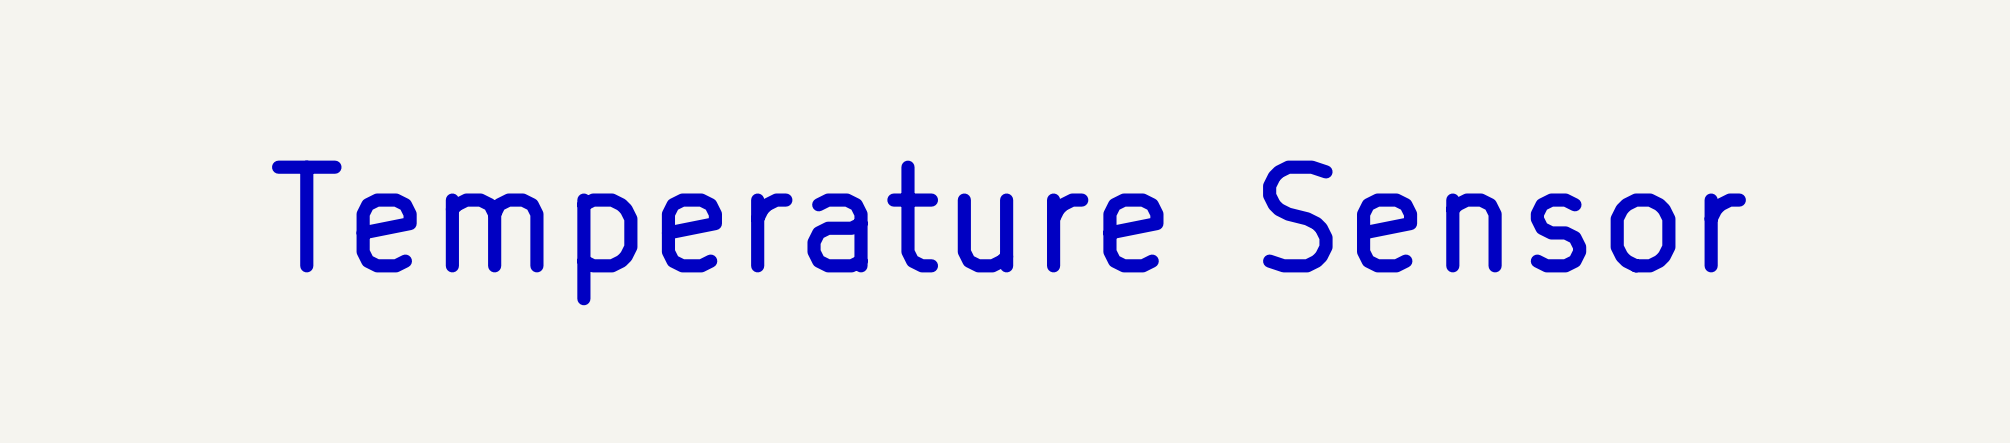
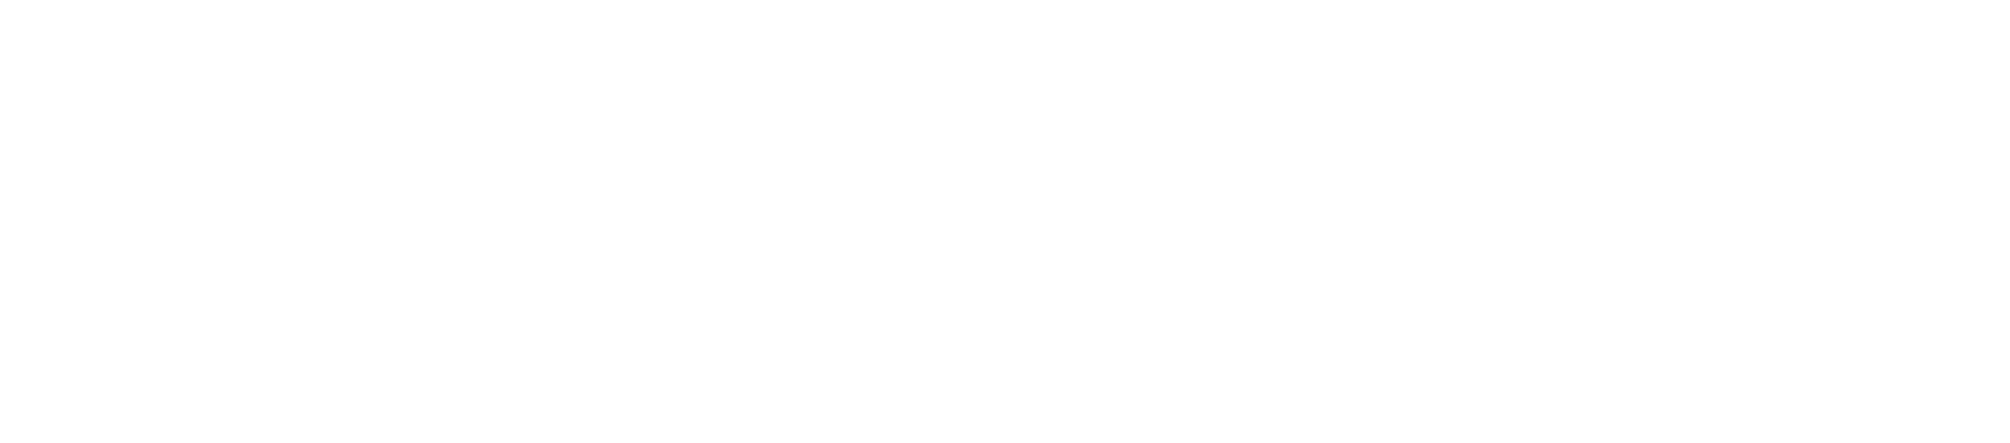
text: Temperature Sensor (1008, 232) -> none

